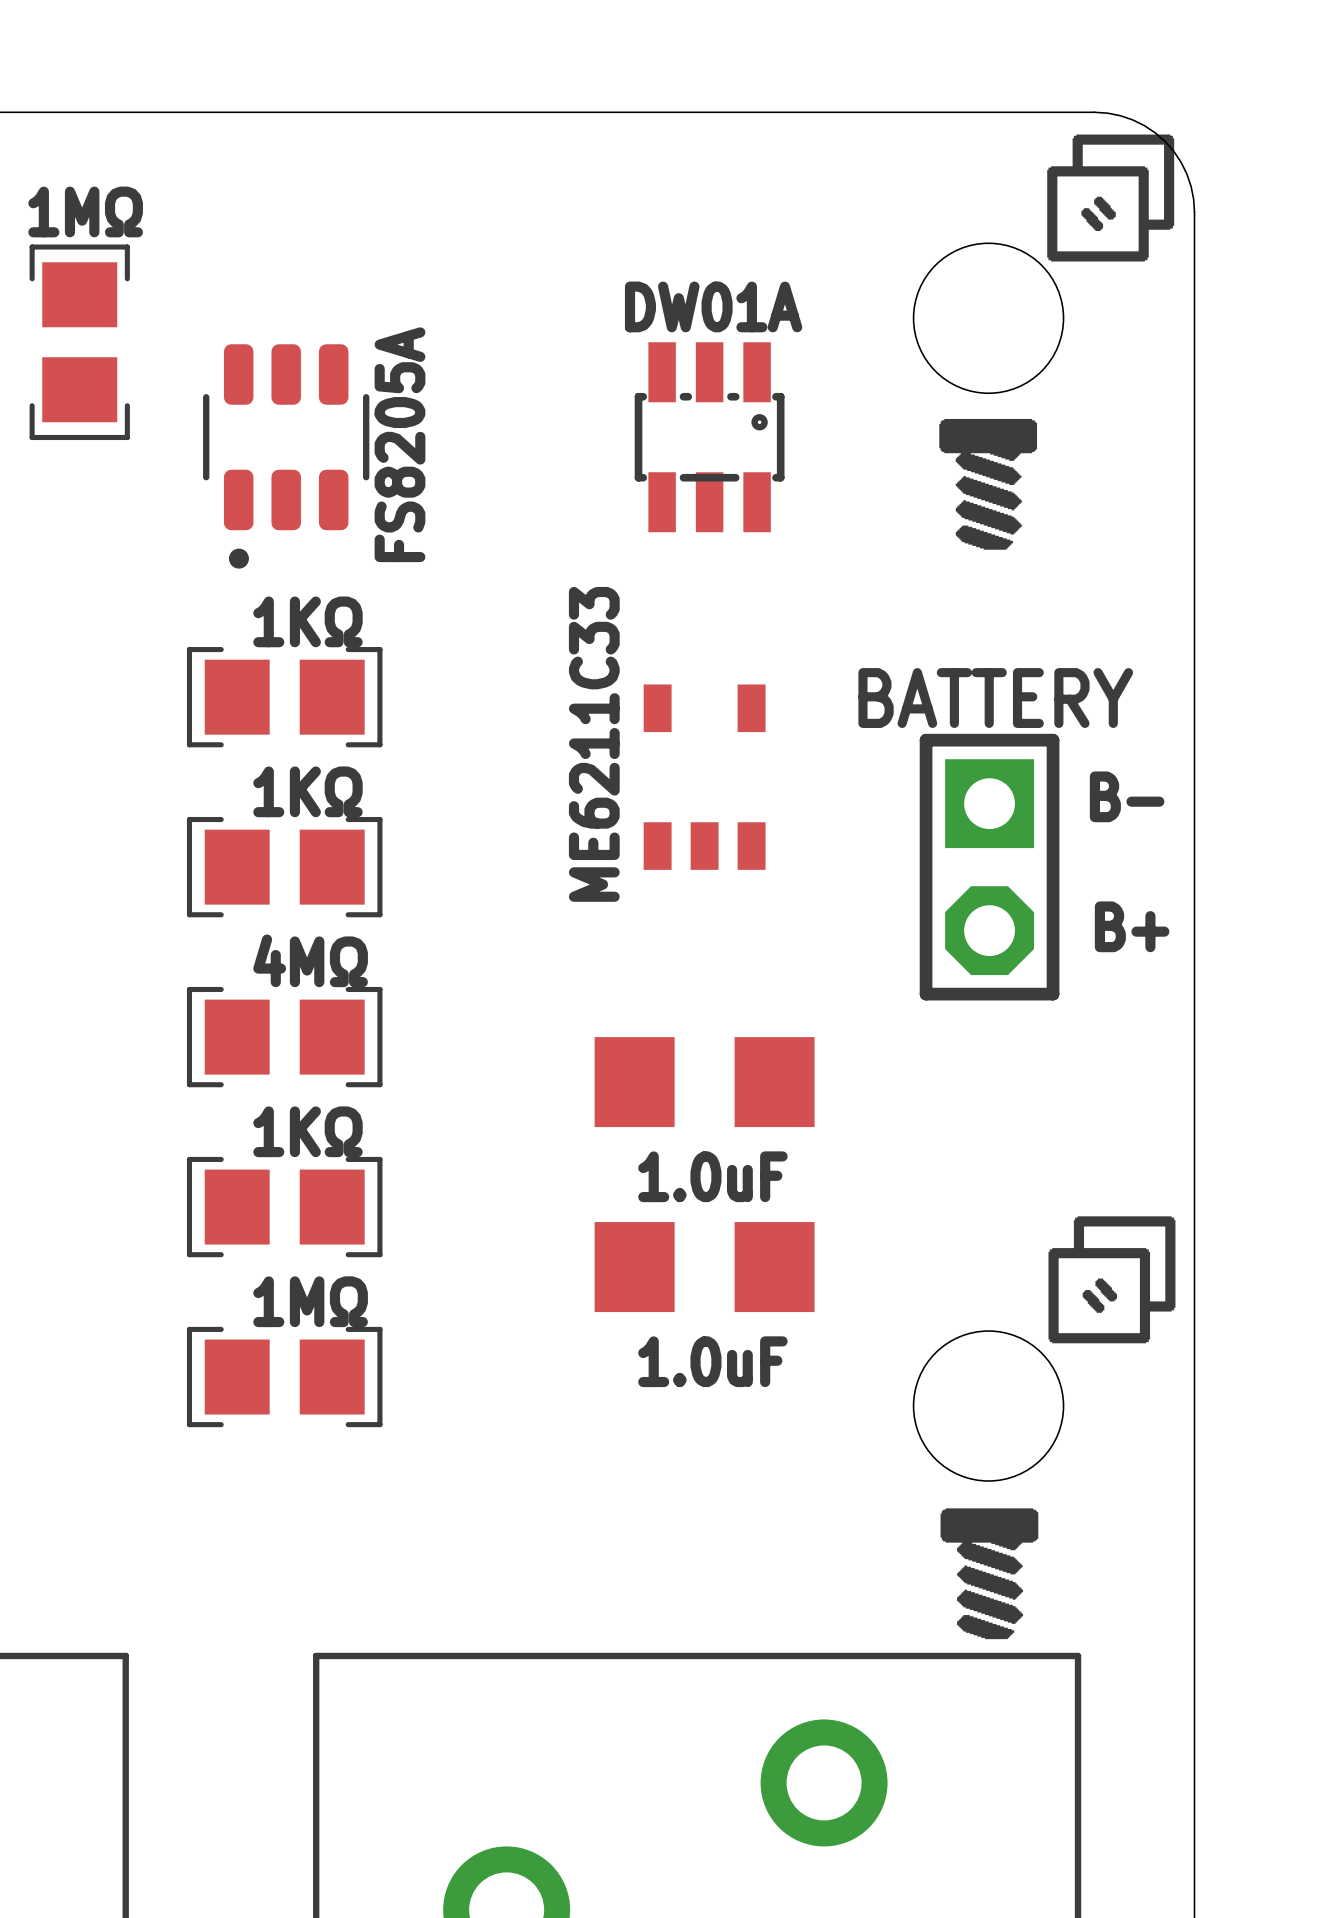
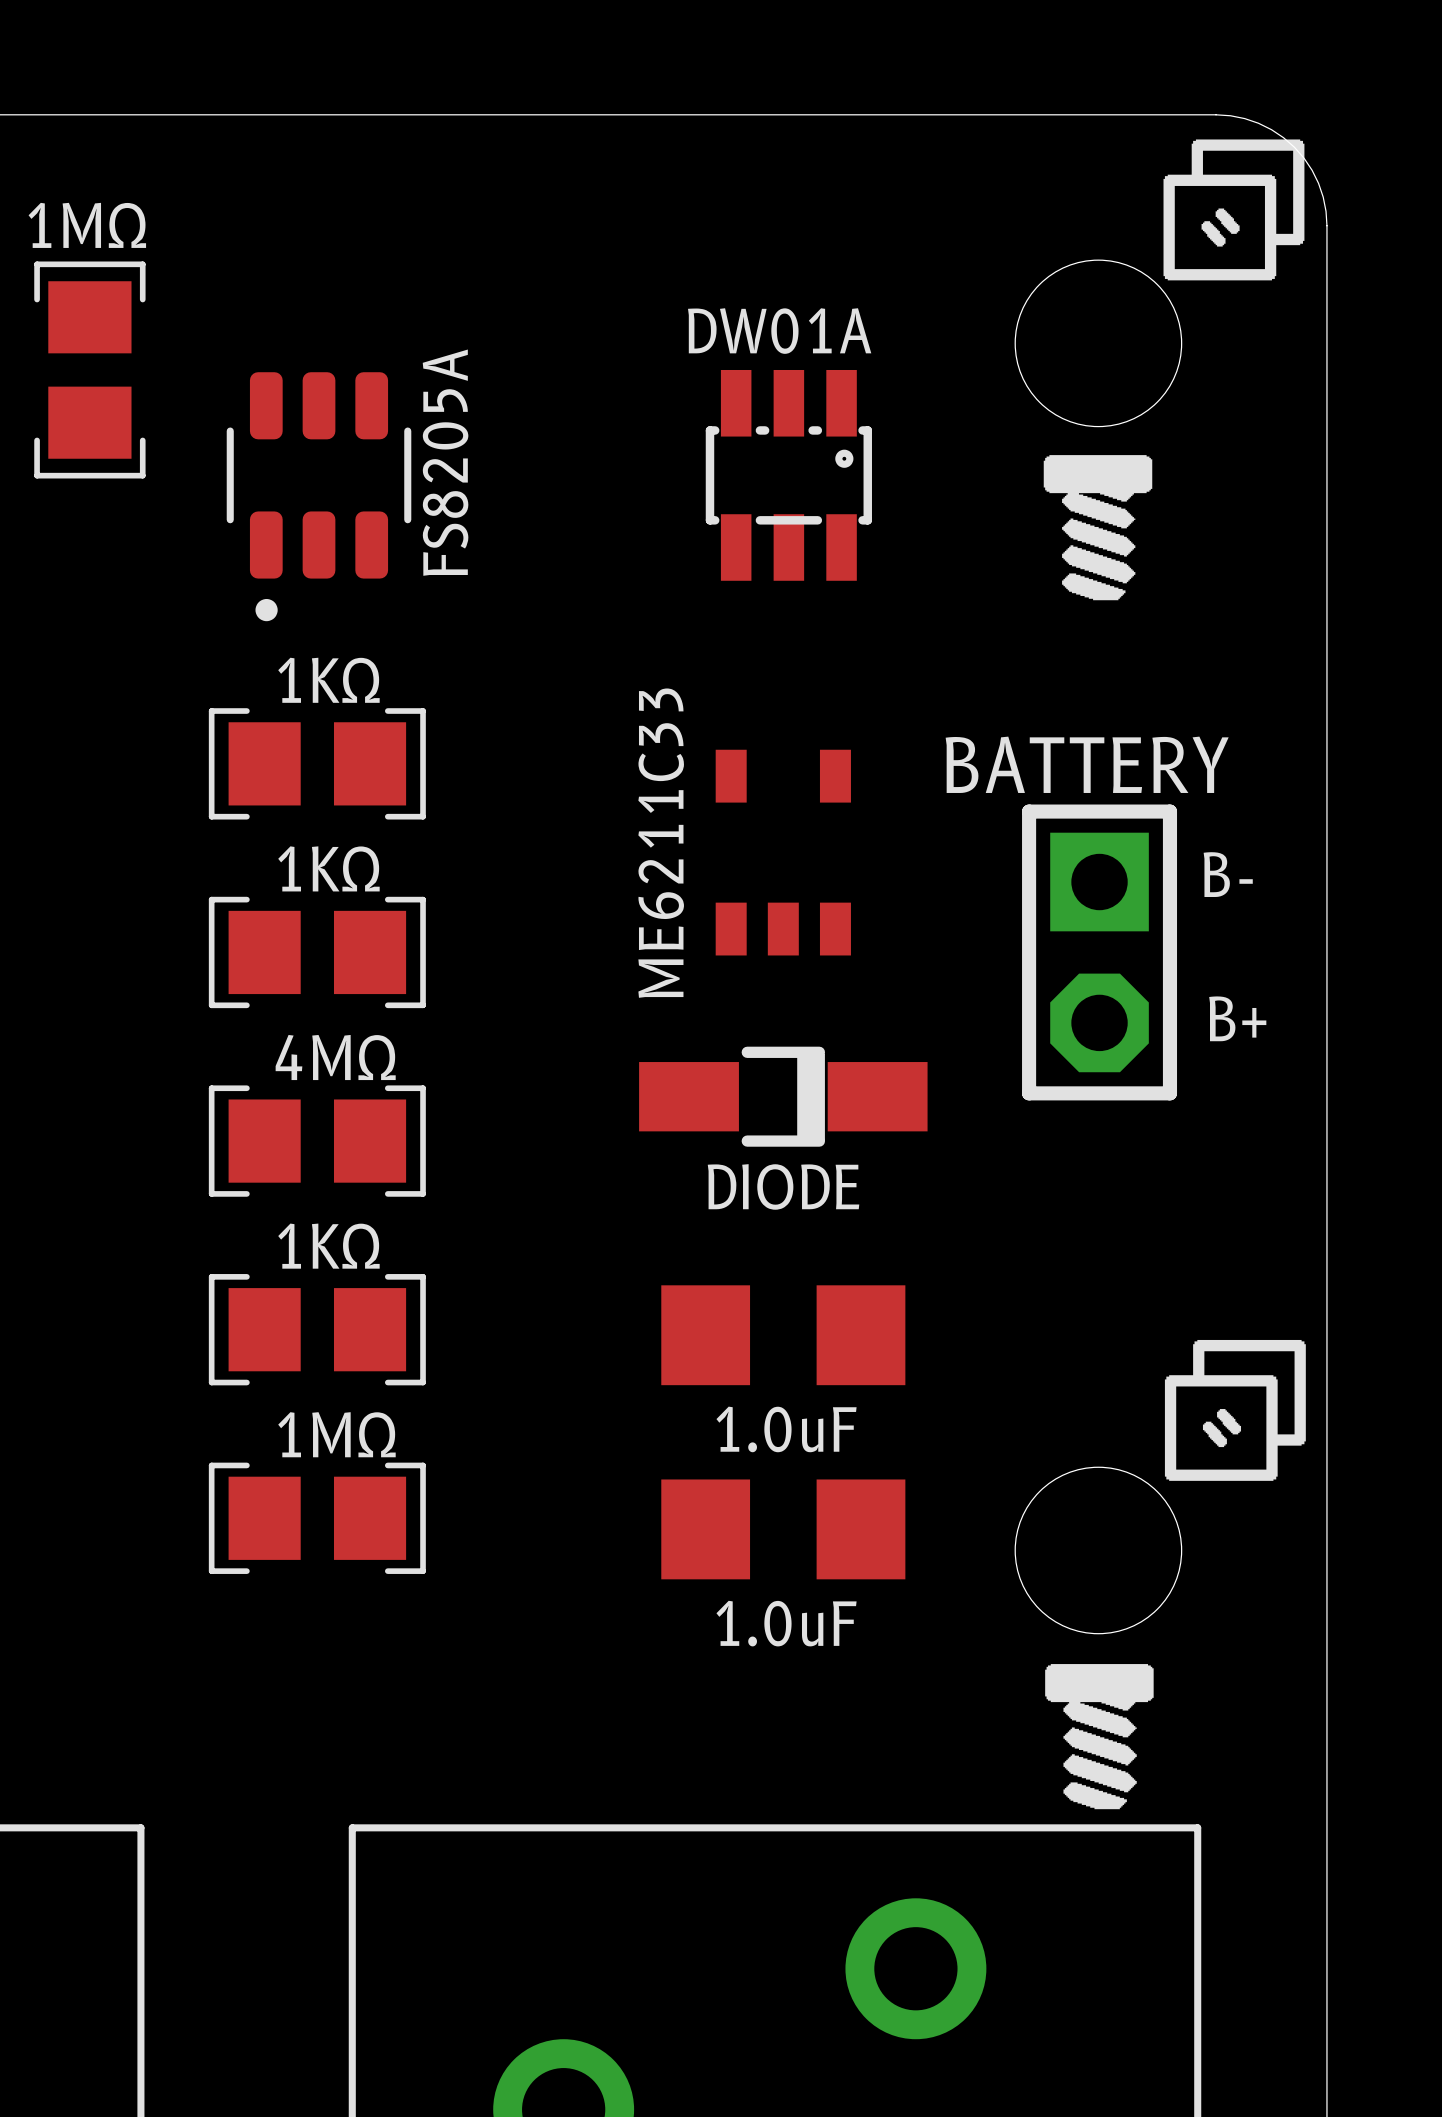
DIODE: none -> (783, 1096)
part: (704, 1082) -> none
text: 1.0uF (712, 1176) -> none
part position: (704, 1267) -> (783, 1335)
text position: 1.0uF (712, 1361) -> 1.0uF (786, 1429)
part: none -> (783, 1529)
text: none -> 1.0uF (786, 1623)

